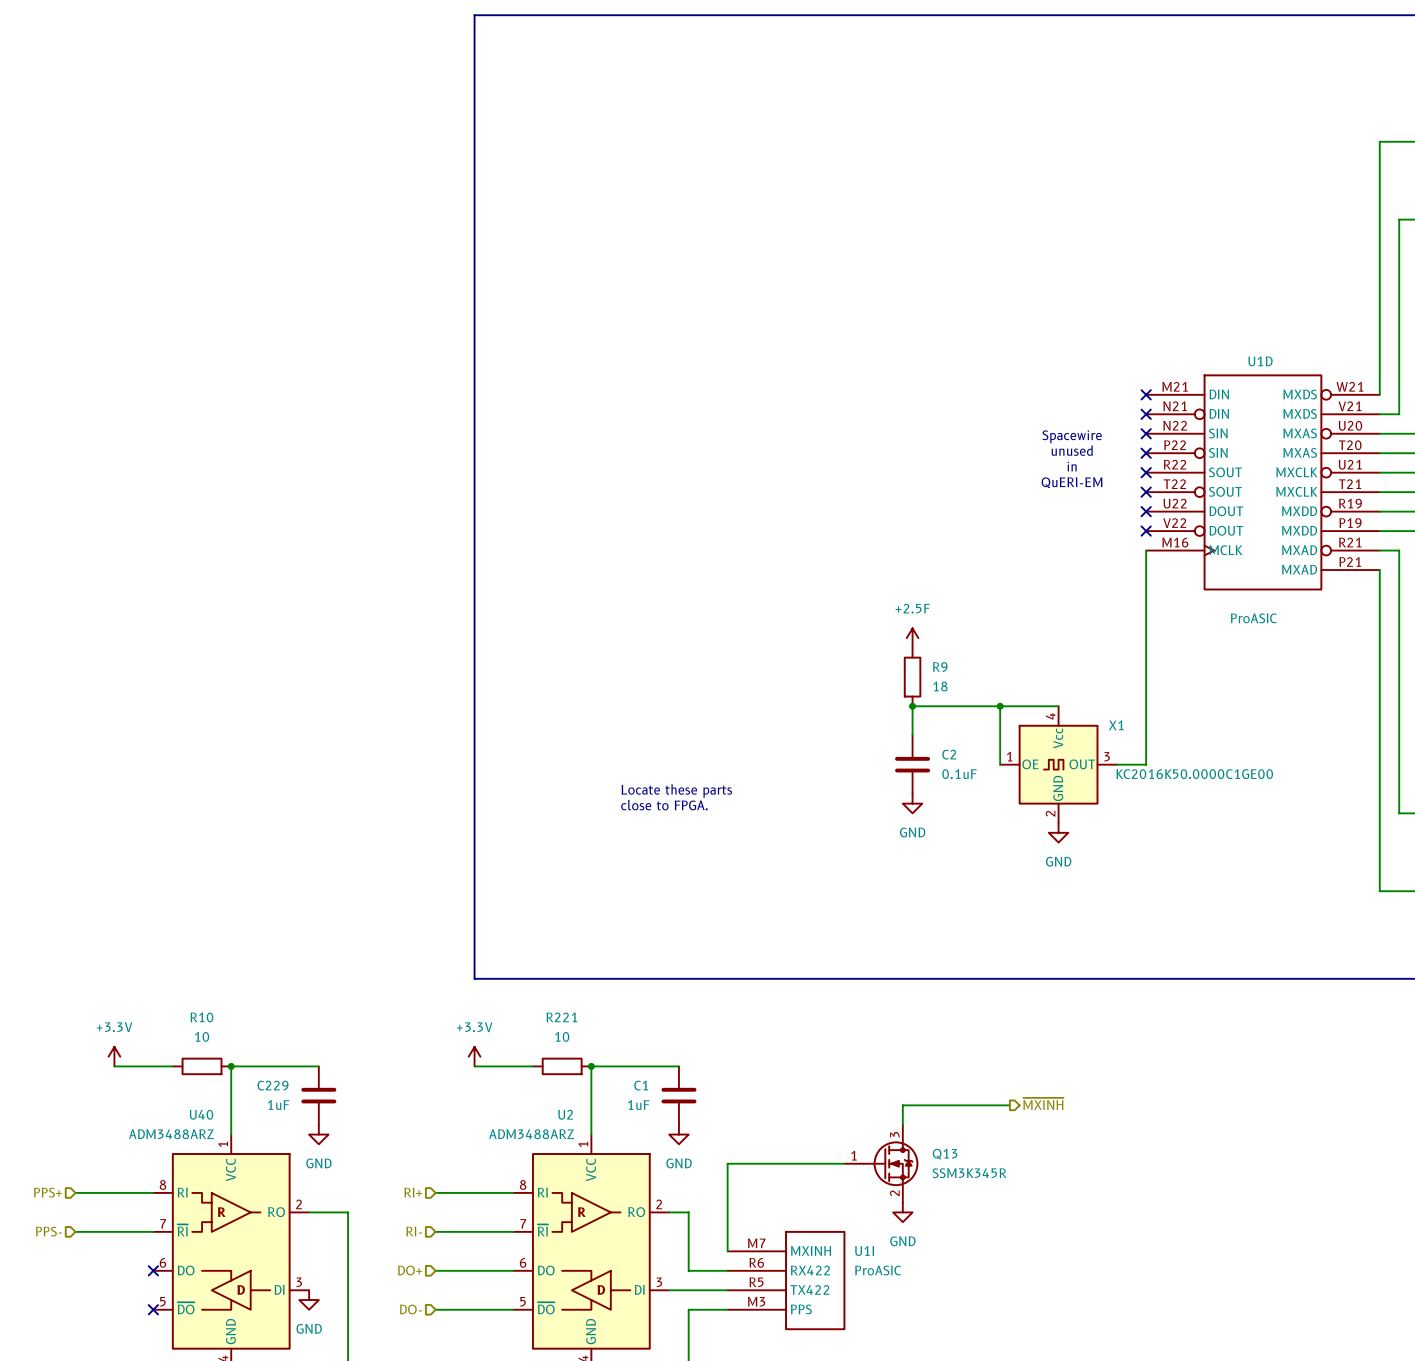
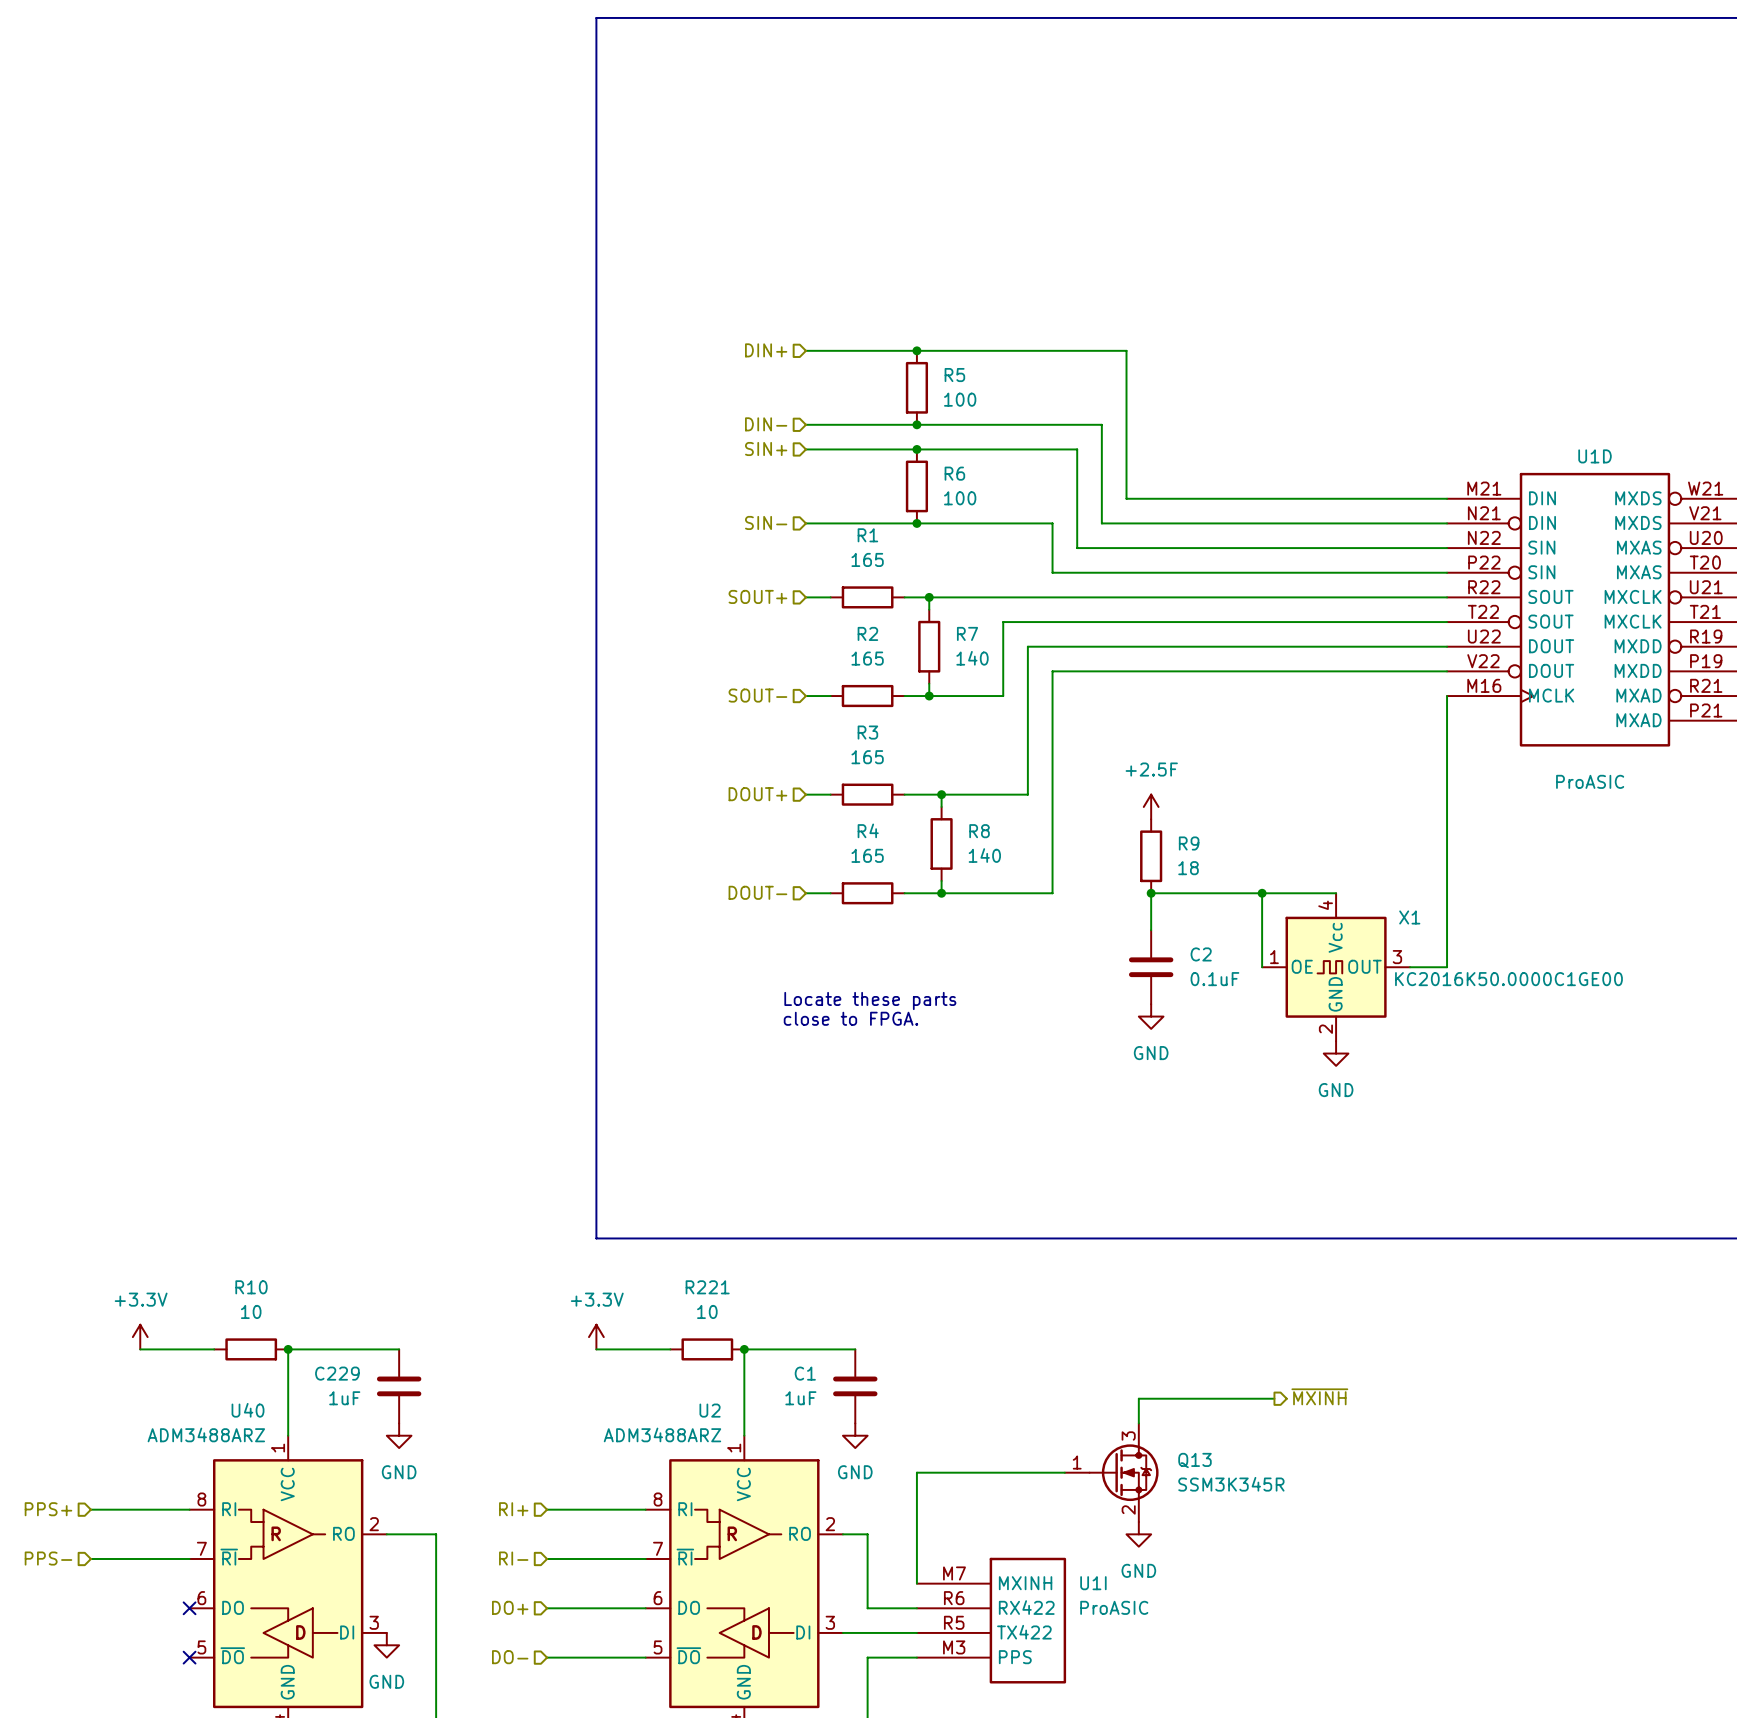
hierarchical label: none -> DIN+ (766, 350)
wire: none -> (805, 350) (1126, 350) (1126, 498) (1447, 498)
junction: none -> (916, 350)
R5: none -> 100 (916, 387)
hierarchical label: none -> DIN- (766, 424)
wire: none -> (805, 424) (1101, 424) (1101, 523) (1447, 523)
junction: none -> (916, 424)
hierarchical label: none -> SIN+ (766, 448)
wire: none -> (805, 449) (1077, 449) (1077, 548) (1447, 548)
junction: none -> (916, 449)
R6: none -> 100 (916, 486)
no-connect mark: (1146, 394) -> none
hierarchical label: none -> SIN- (766, 522)
wire: none -> (805, 523) (1052, 523) (1052, 572) (1447, 572)
junction: none -> (916, 523)
no-connect mark: (1146, 414) -> none
no-connect mark: (1146, 433) -> none
text: Spacewire (1072, 436) -> none
text: unused (1072, 450) -> none
no-connect mark: (1146, 453) -> none
text: in (1072, 466) -> none
hierarchical label: none -> SOUT+ (757, 596)
wire: none -> (805, 597) (830, 597)
R1: none -> 165 (867, 597)
wire: none -> (904, 597) (1447, 597)
wire: none -> (929, 597) (929, 609)
junction: none -> (929, 597)
no-connect mark: (1146, 472) -> none
text: QuERI-EM (1071, 482) -> none
wire: none -> (1447, 622) (1003, 622) (1003, 696) (904, 696)
no-connect mark: (1146, 492) -> none
R7: none -> 140 (929, 646)
wire: none -> (1447, 646) (1027, 646) (1027, 794) (904, 794)
no-connect mark: (1146, 511) -> none
wire: none -> (1447, 671) (1052, 671) (1052, 893) (904, 893)
no-connect mark: (1146, 531) -> none
wire: none -> (929, 683) (929, 696)
hierarchical label: none -> SOUT- (757, 695)
wire: none -> (805, 696) (830, 696)
R2: none -> 165 (867, 696)
junction: none -> (929, 696)
hierarchical label: none -> DOUT+ (757, 794)
wire: none -> (805, 794) (830, 794)
R3: none -> 165 (867, 794)
wire: none -> (941, 794) (941, 806)
junction: none -> (941, 794)
R8: none -> 140 (941, 843)
wire: none -> (941, 880) (941, 893)
hierarchical label: none -> DOUT- (757, 892)
wire: none -> (805, 893) (830, 893)
R4: none -> 165 (867, 893)
junction: none -> (941, 893)

